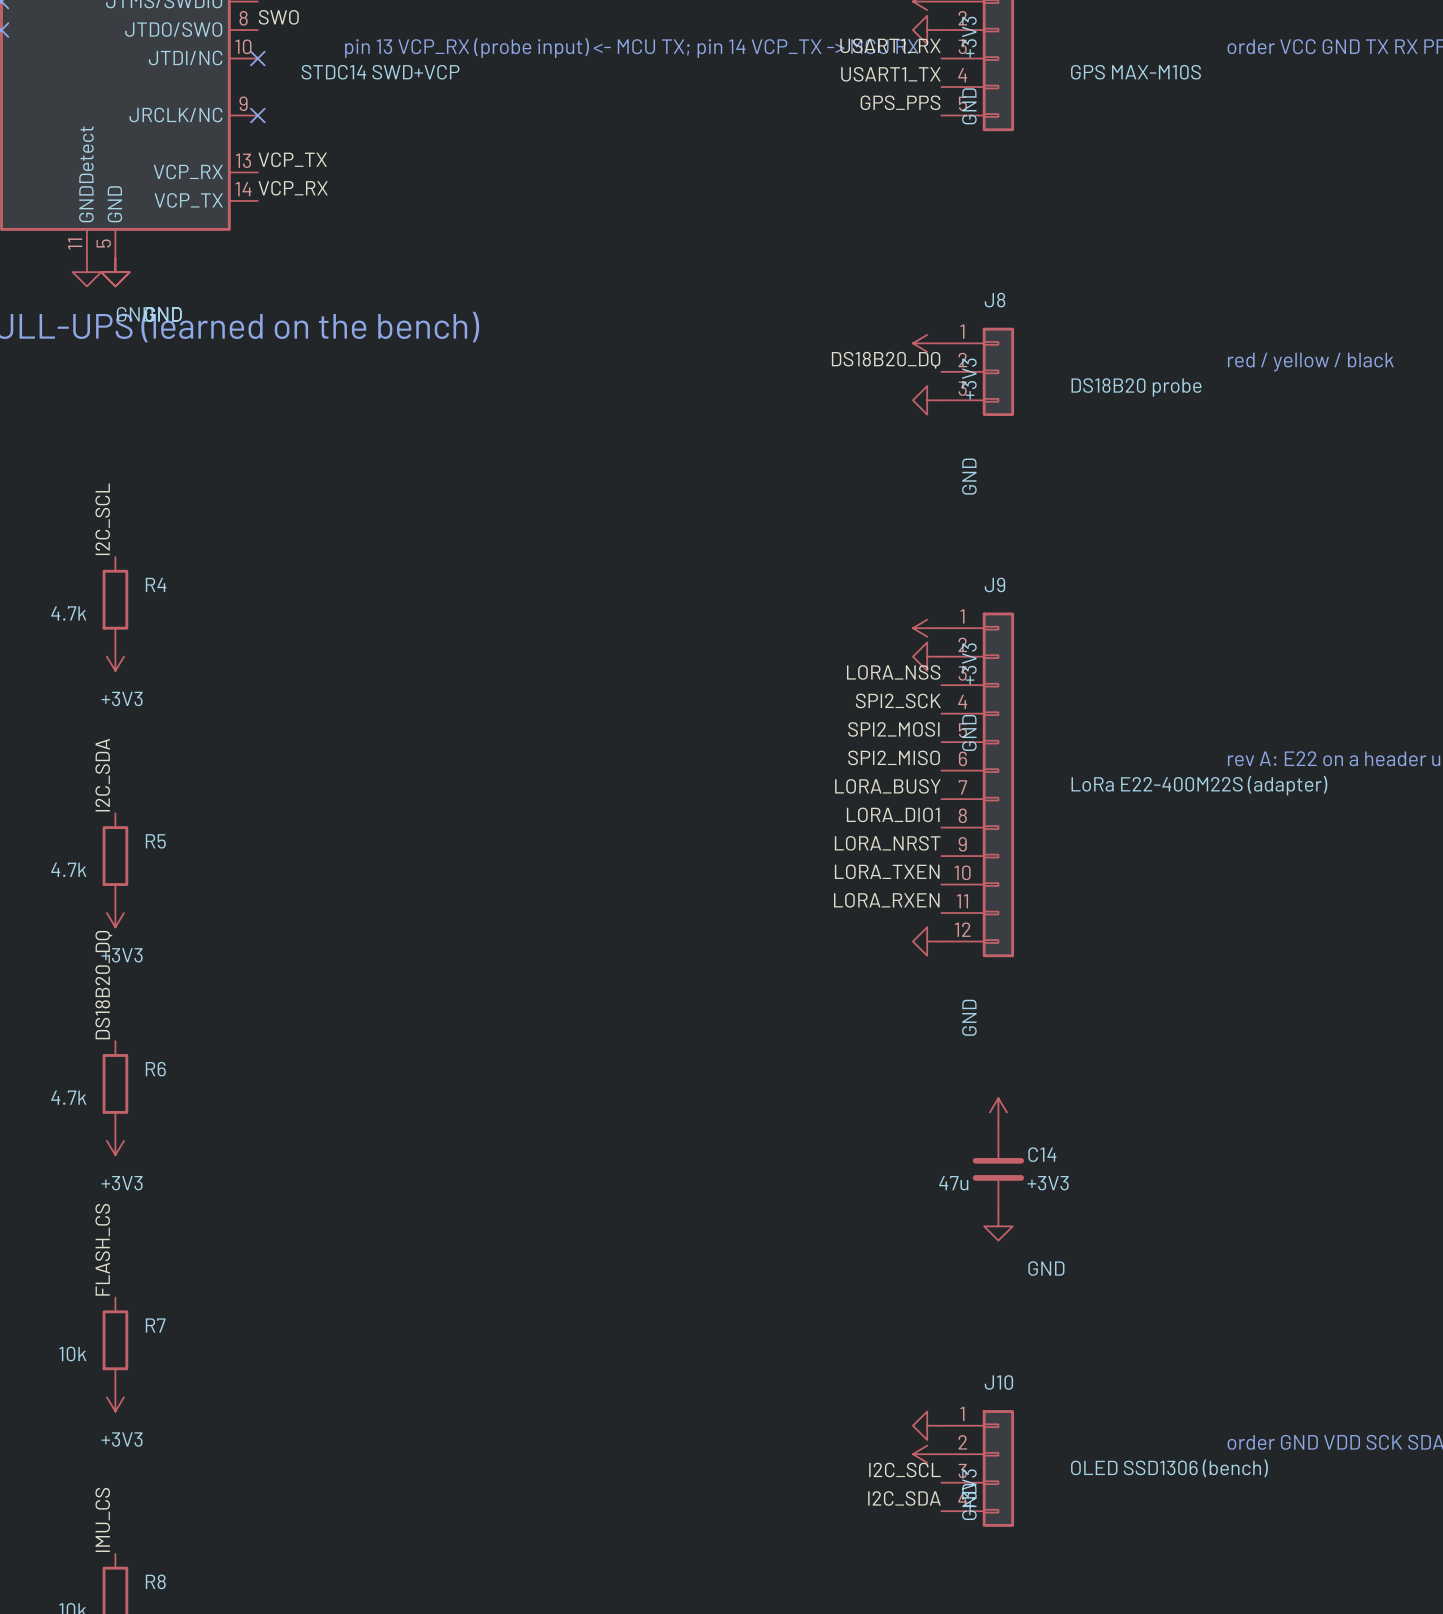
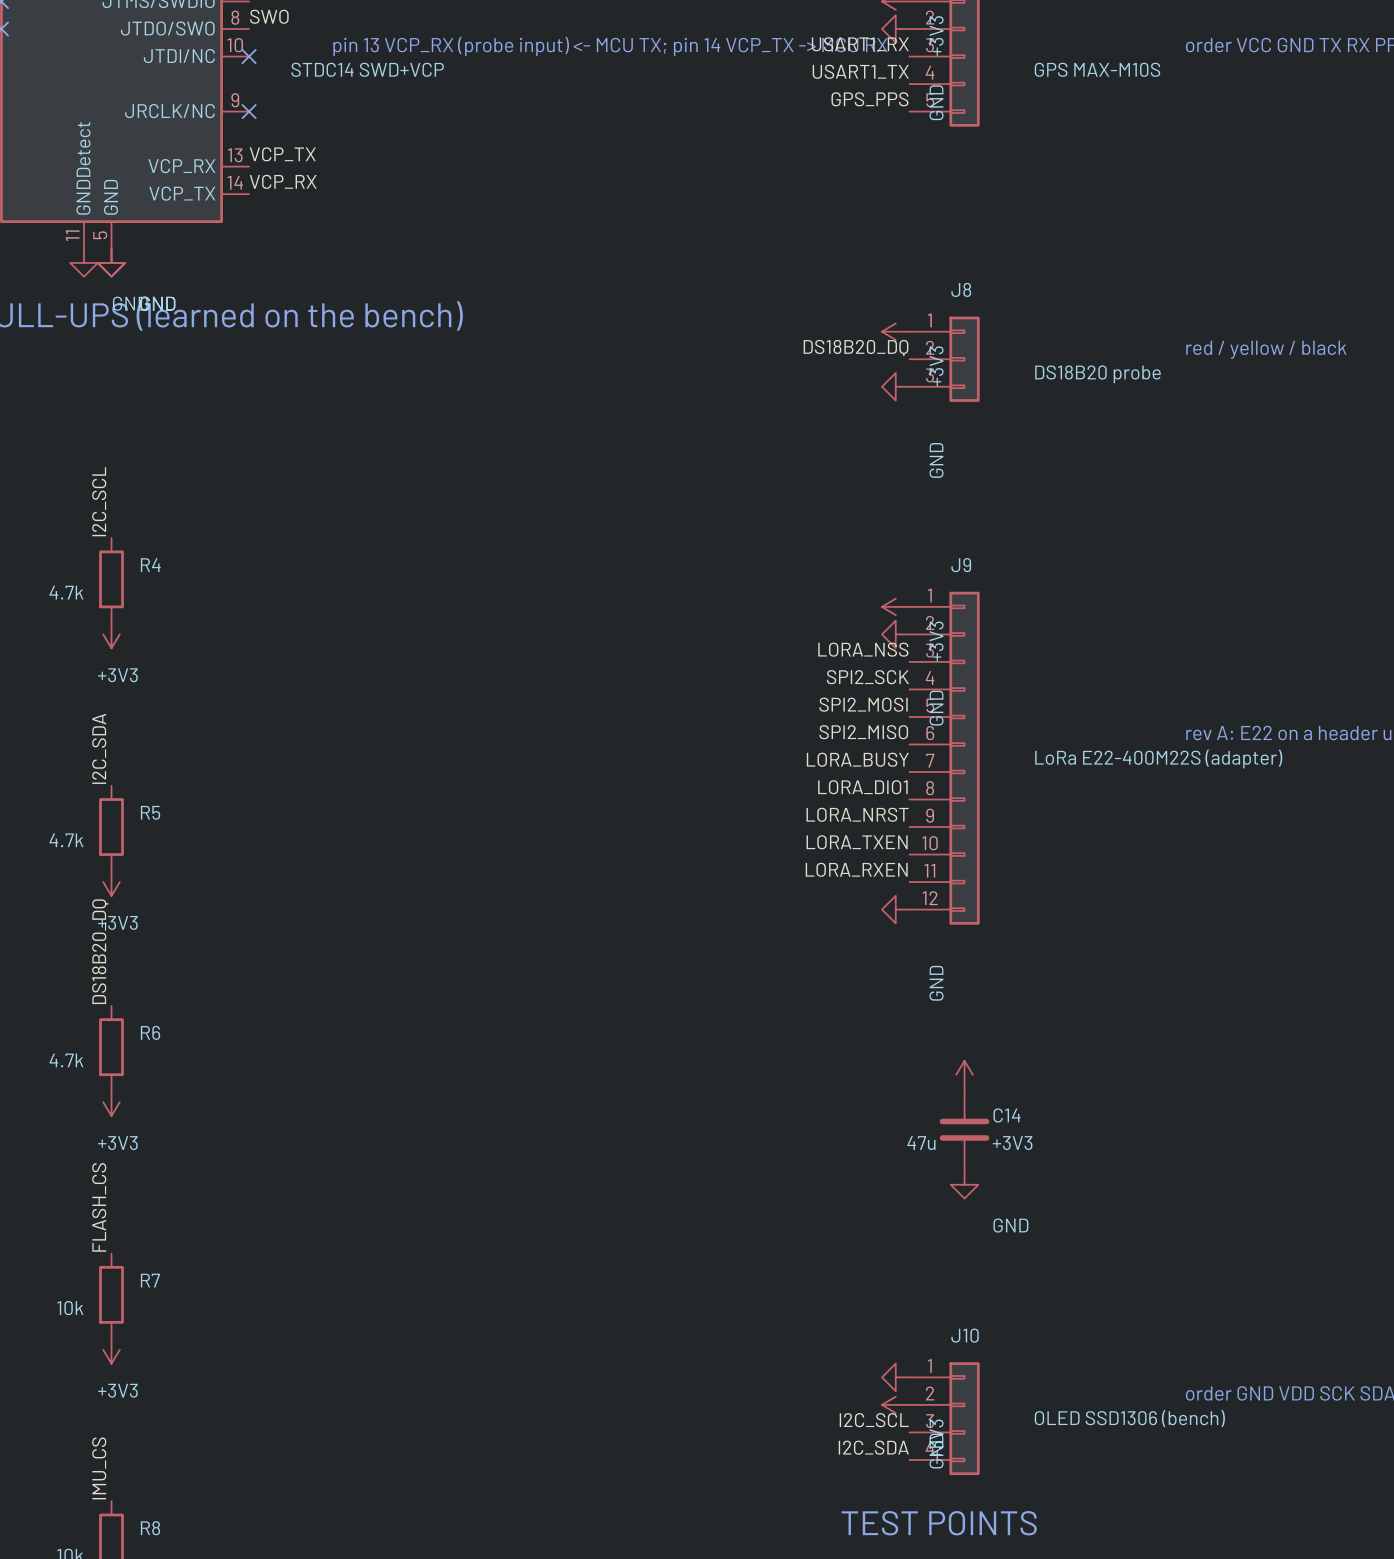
text: none -> TEST POINTS (939, 1523)

